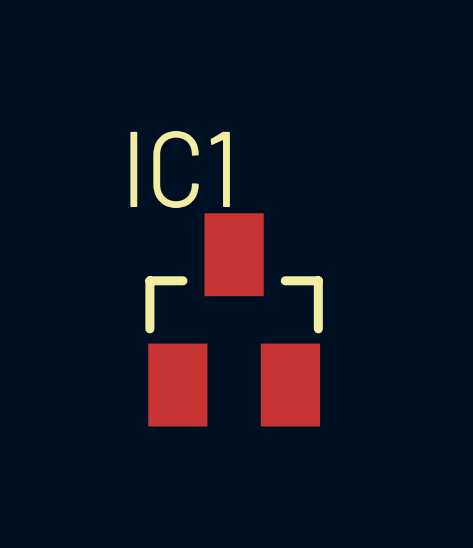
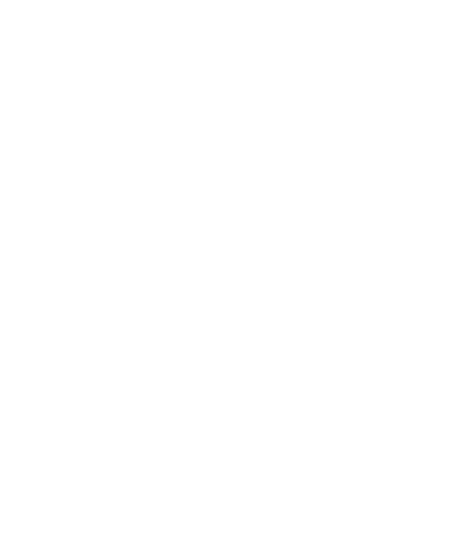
IC1: (234, 319) -> none

